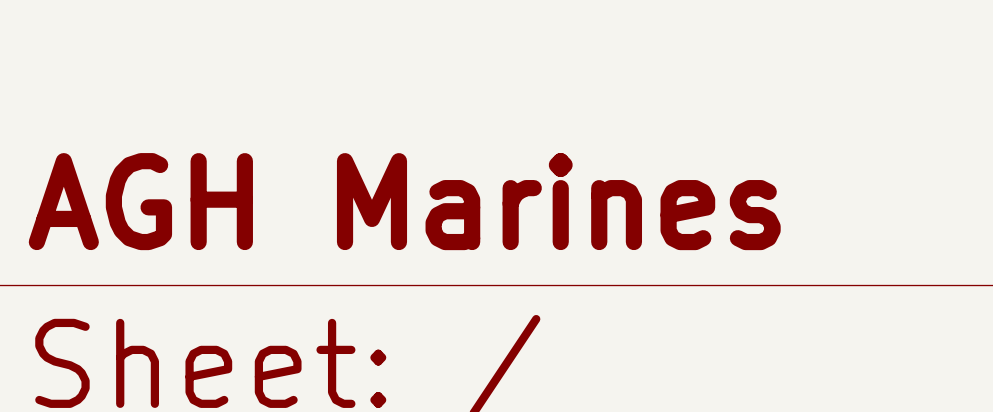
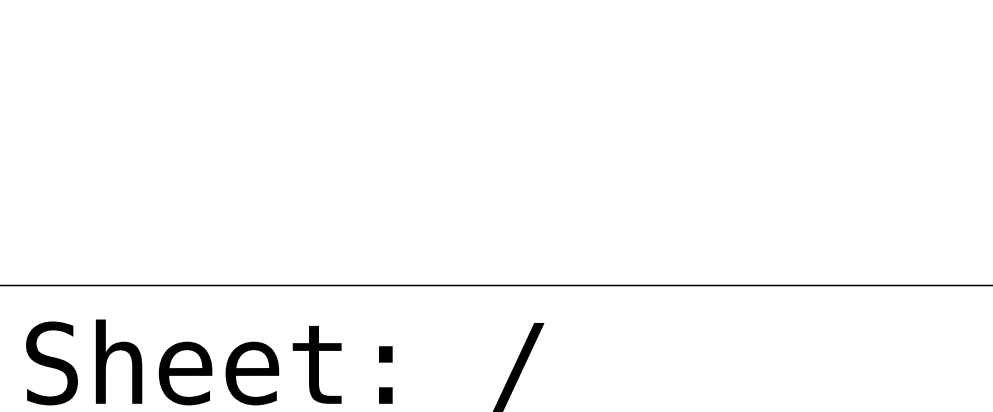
title block: AGH Marines (404, 201) -> none

